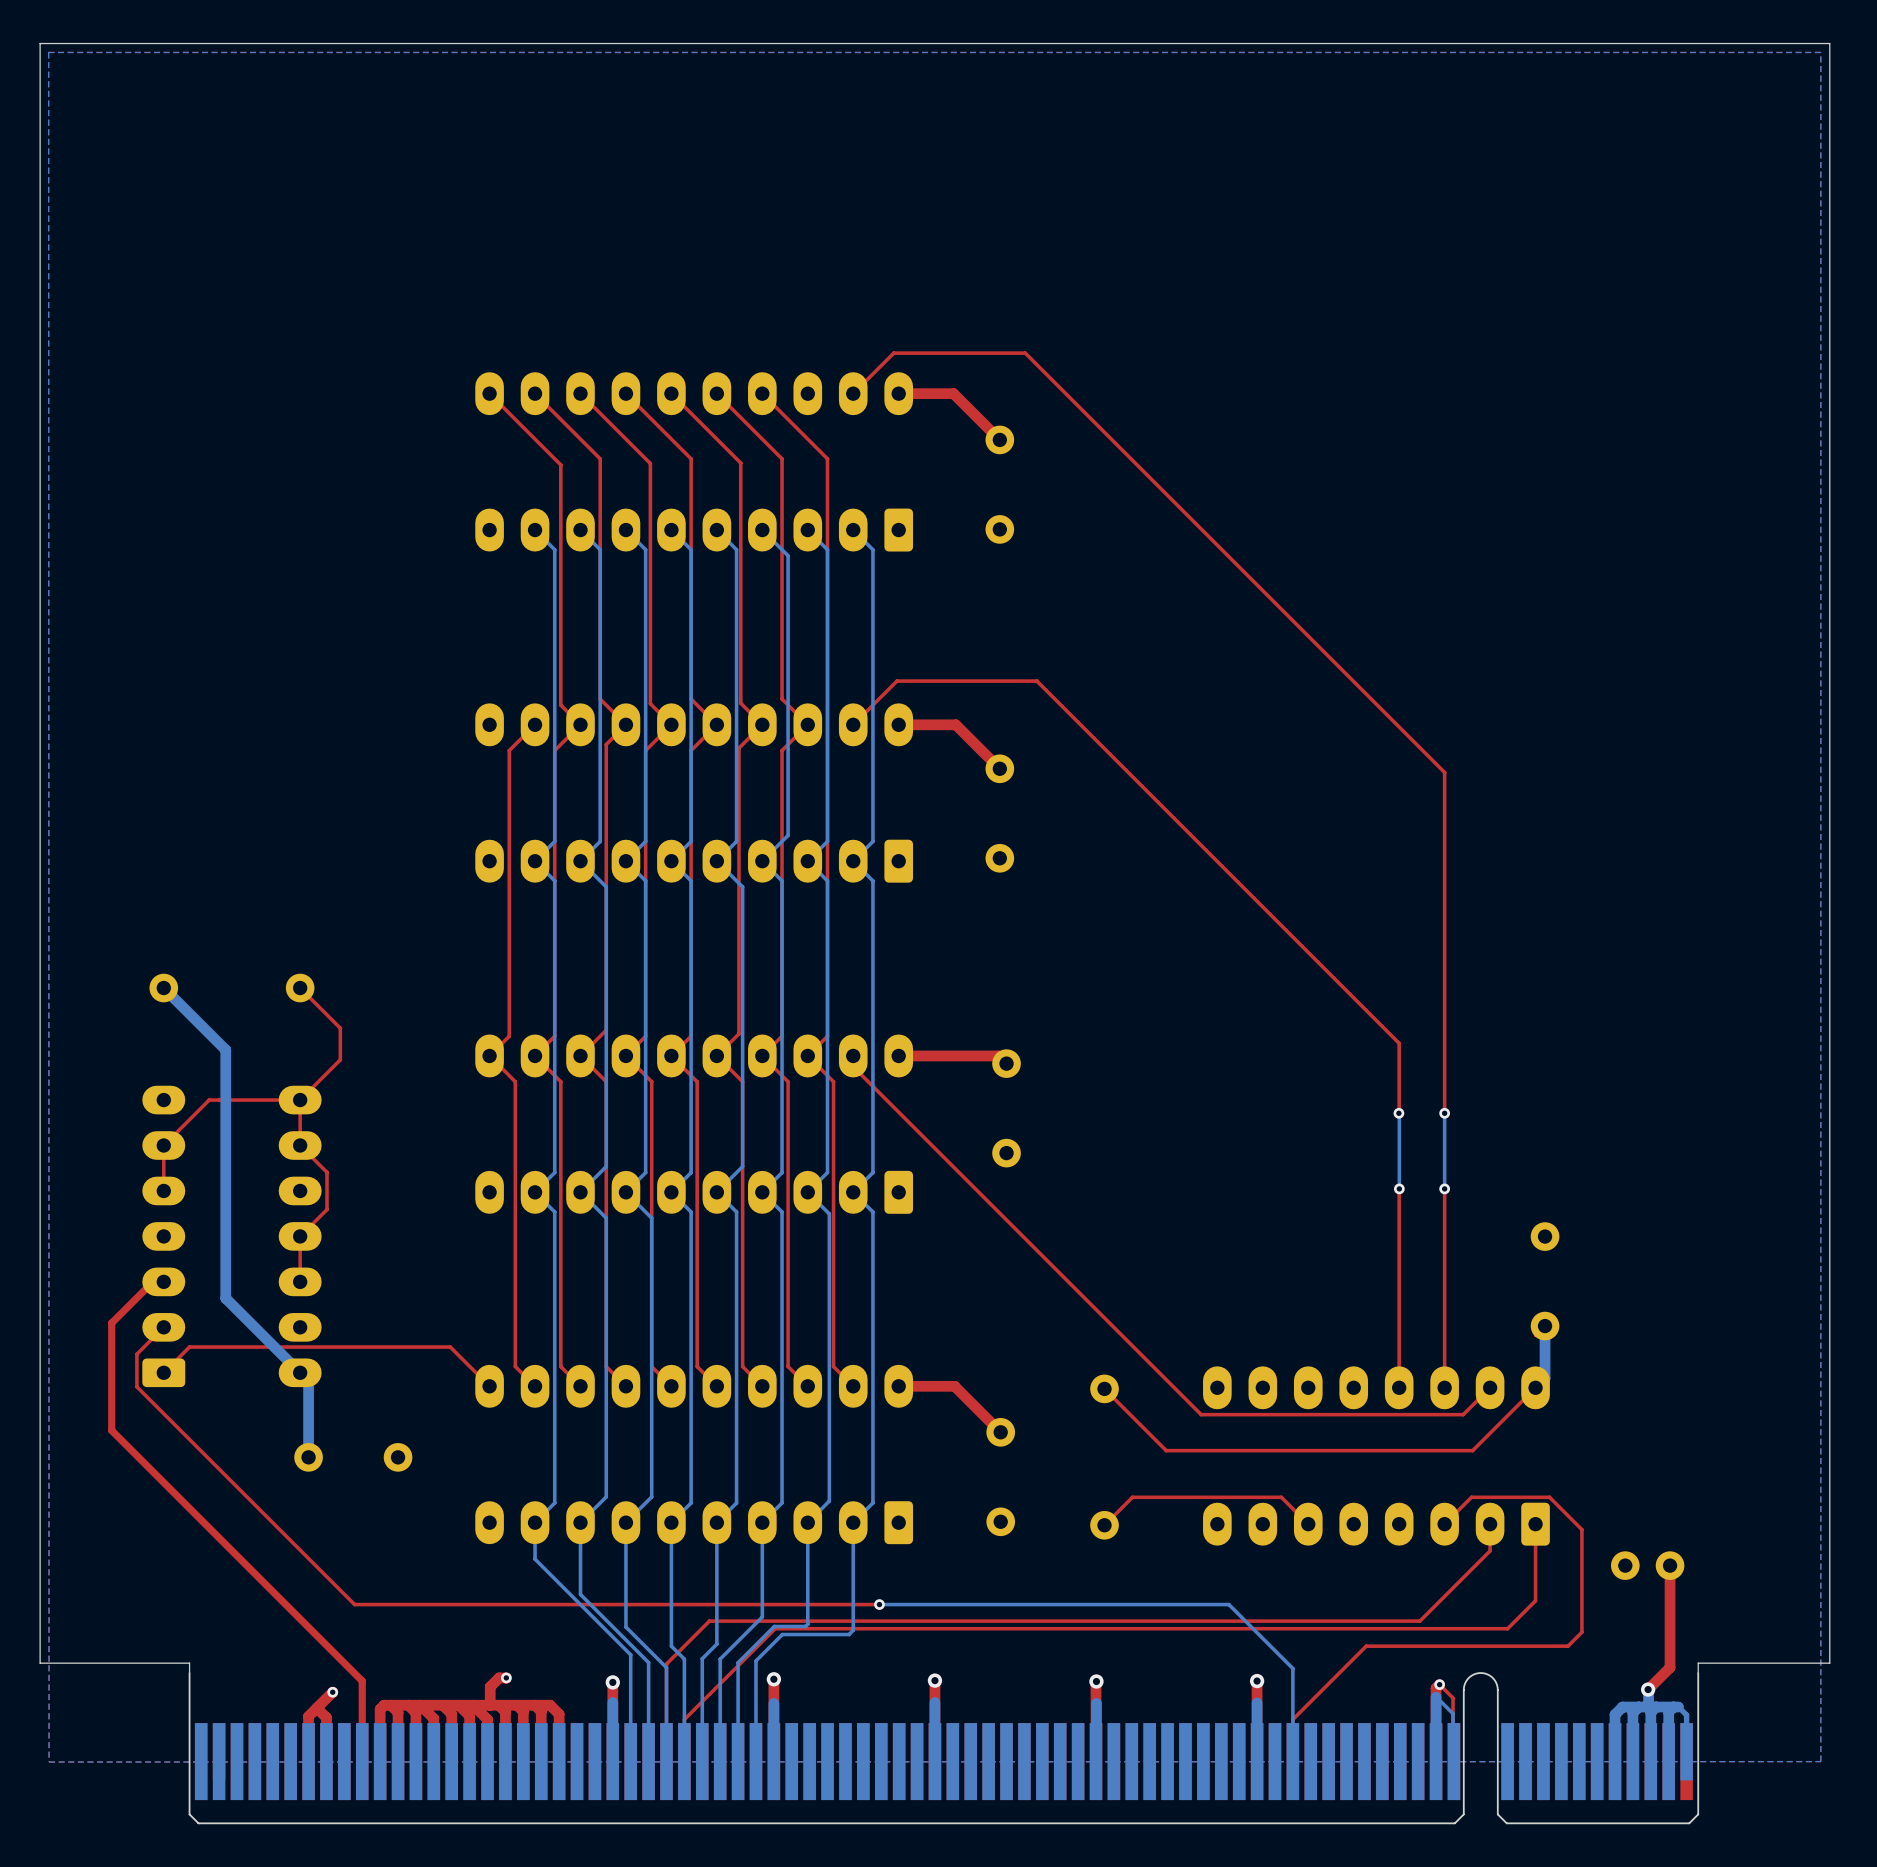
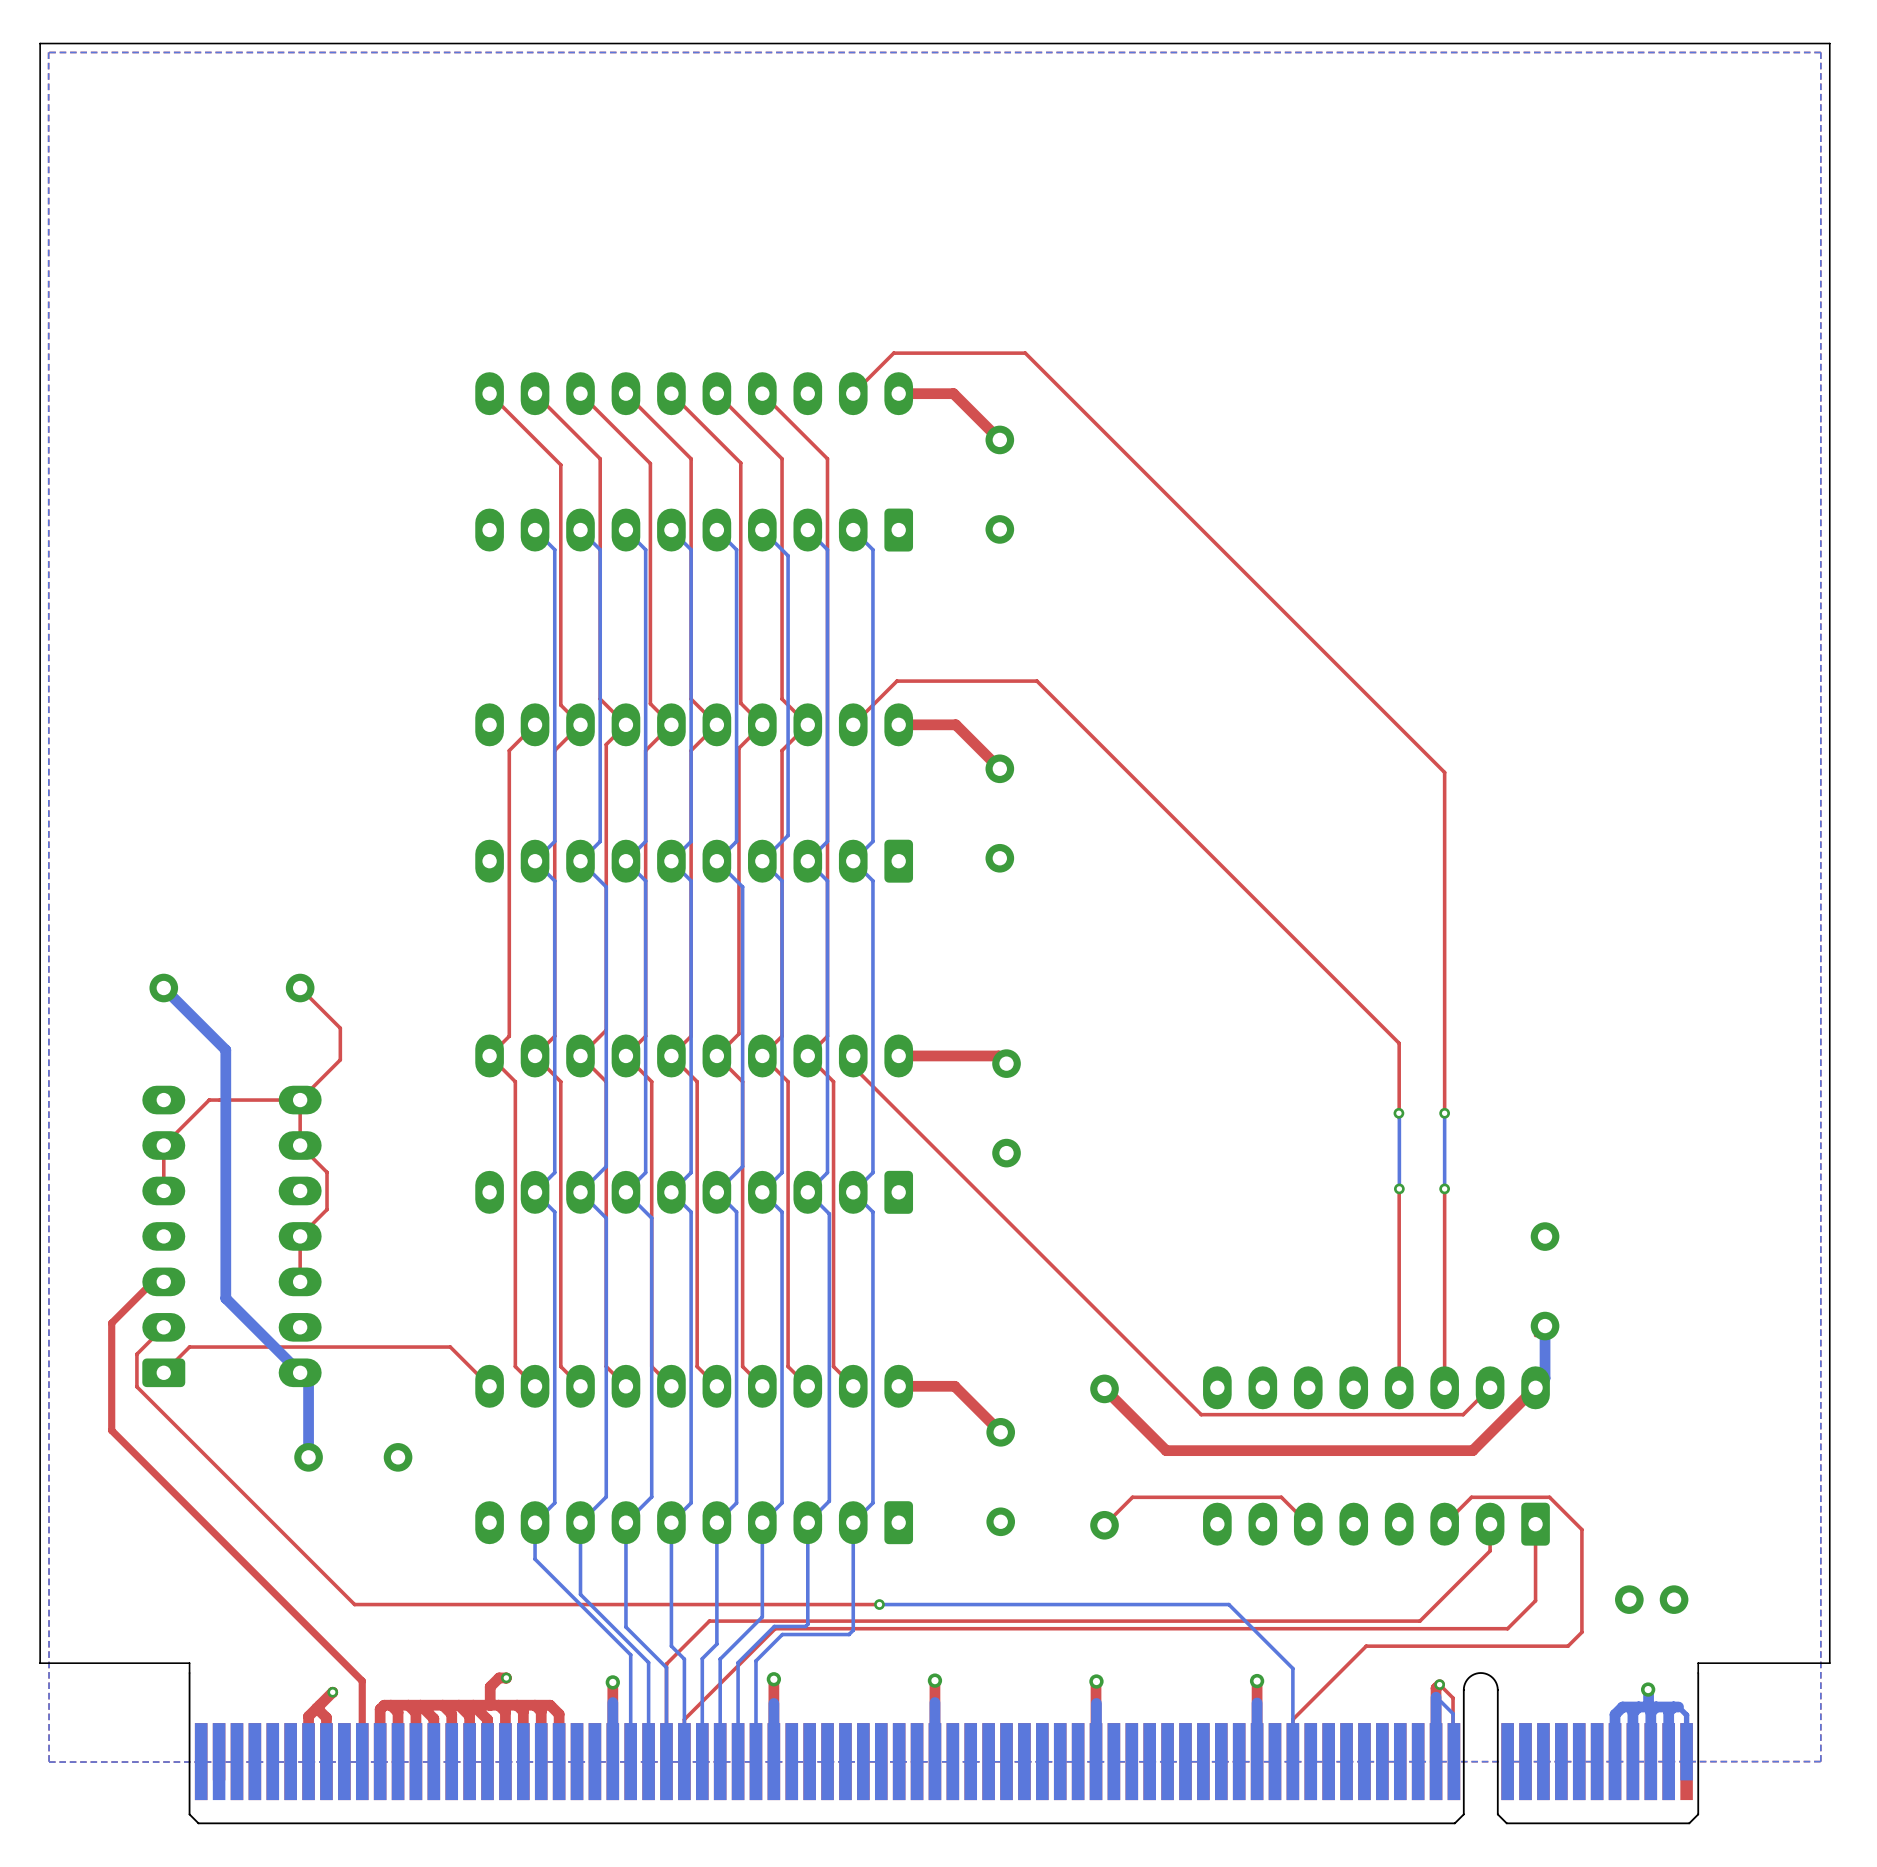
top track width: thin (1535, 1387) (1472, 1450) (1166, 1450) (1104, 1388) -> thick (1535, 1387) (1472, 1450) (1166, 1450) (1104, 1388)
part position: (1647, 1565) -> (1651, 1599)
top track: (1670, 1565) (1670, 1667) (1648, 1689) -> none

